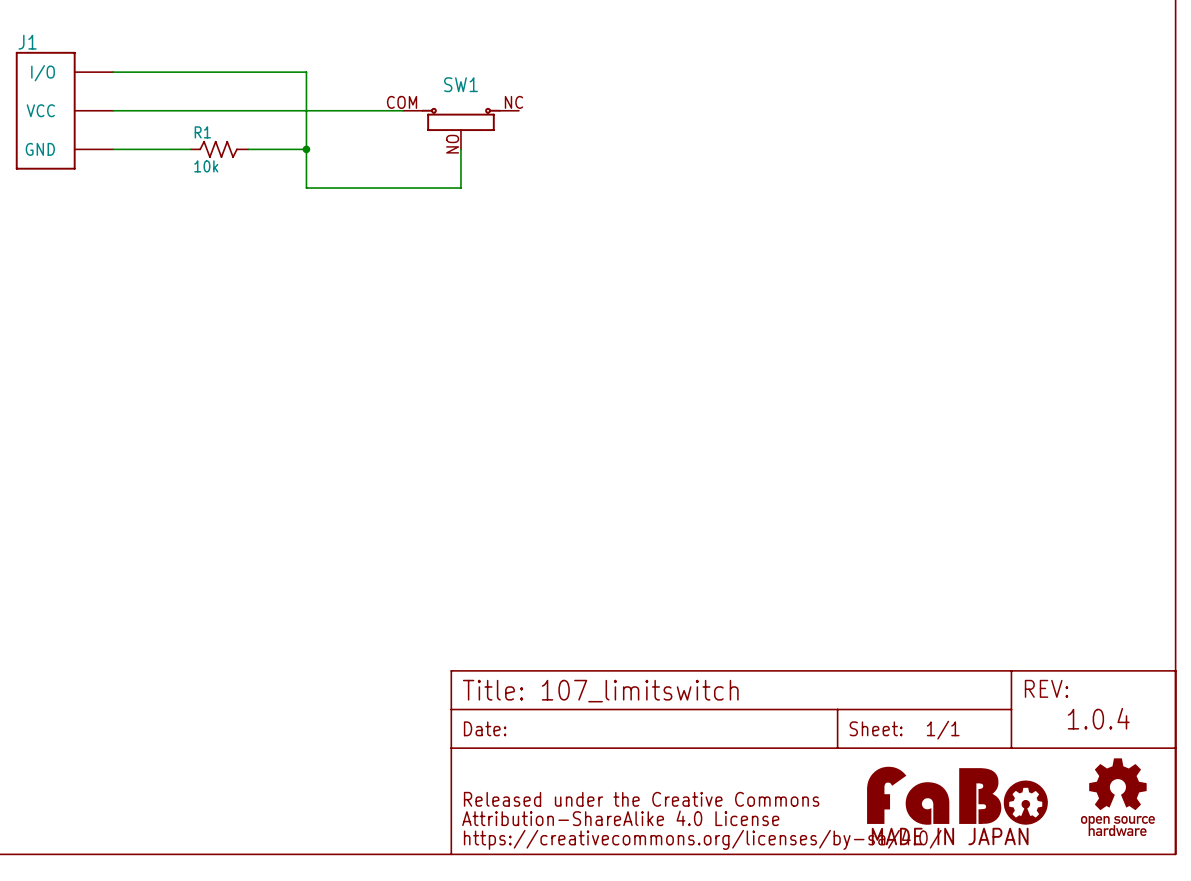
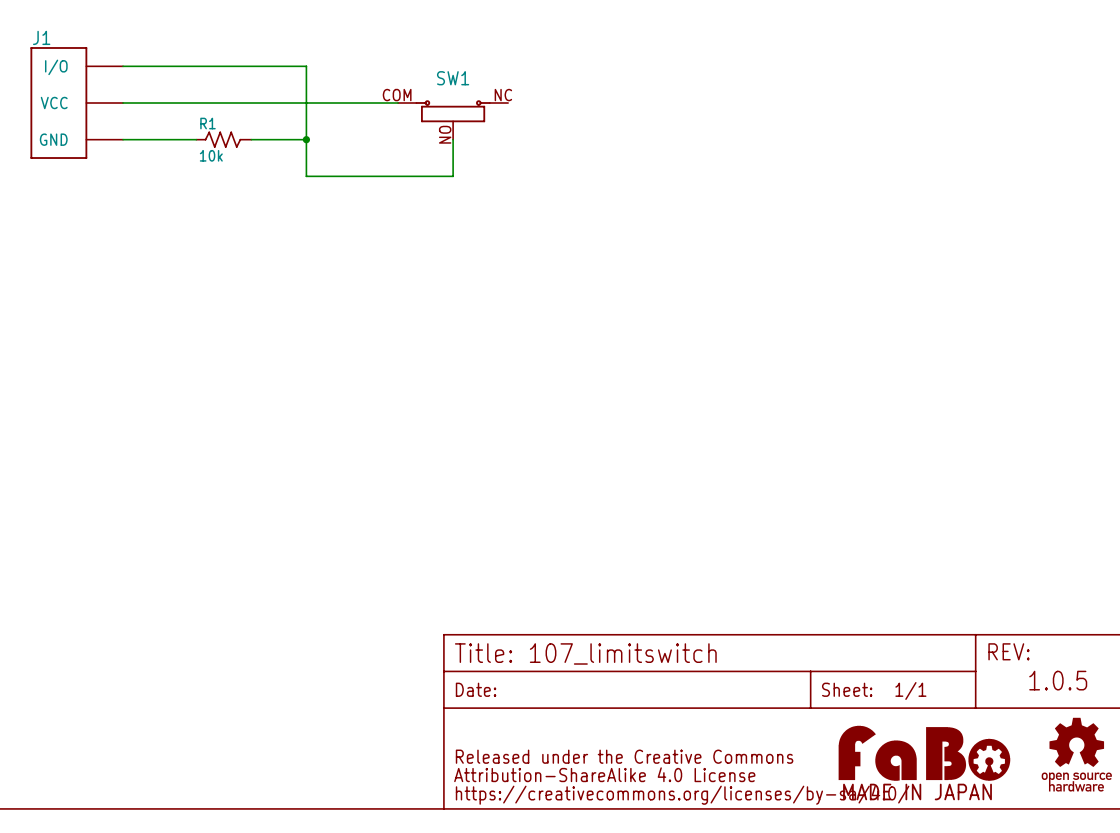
text: 1.0.4 (1098, 718) -> 1.0.5 (1058, 680)

